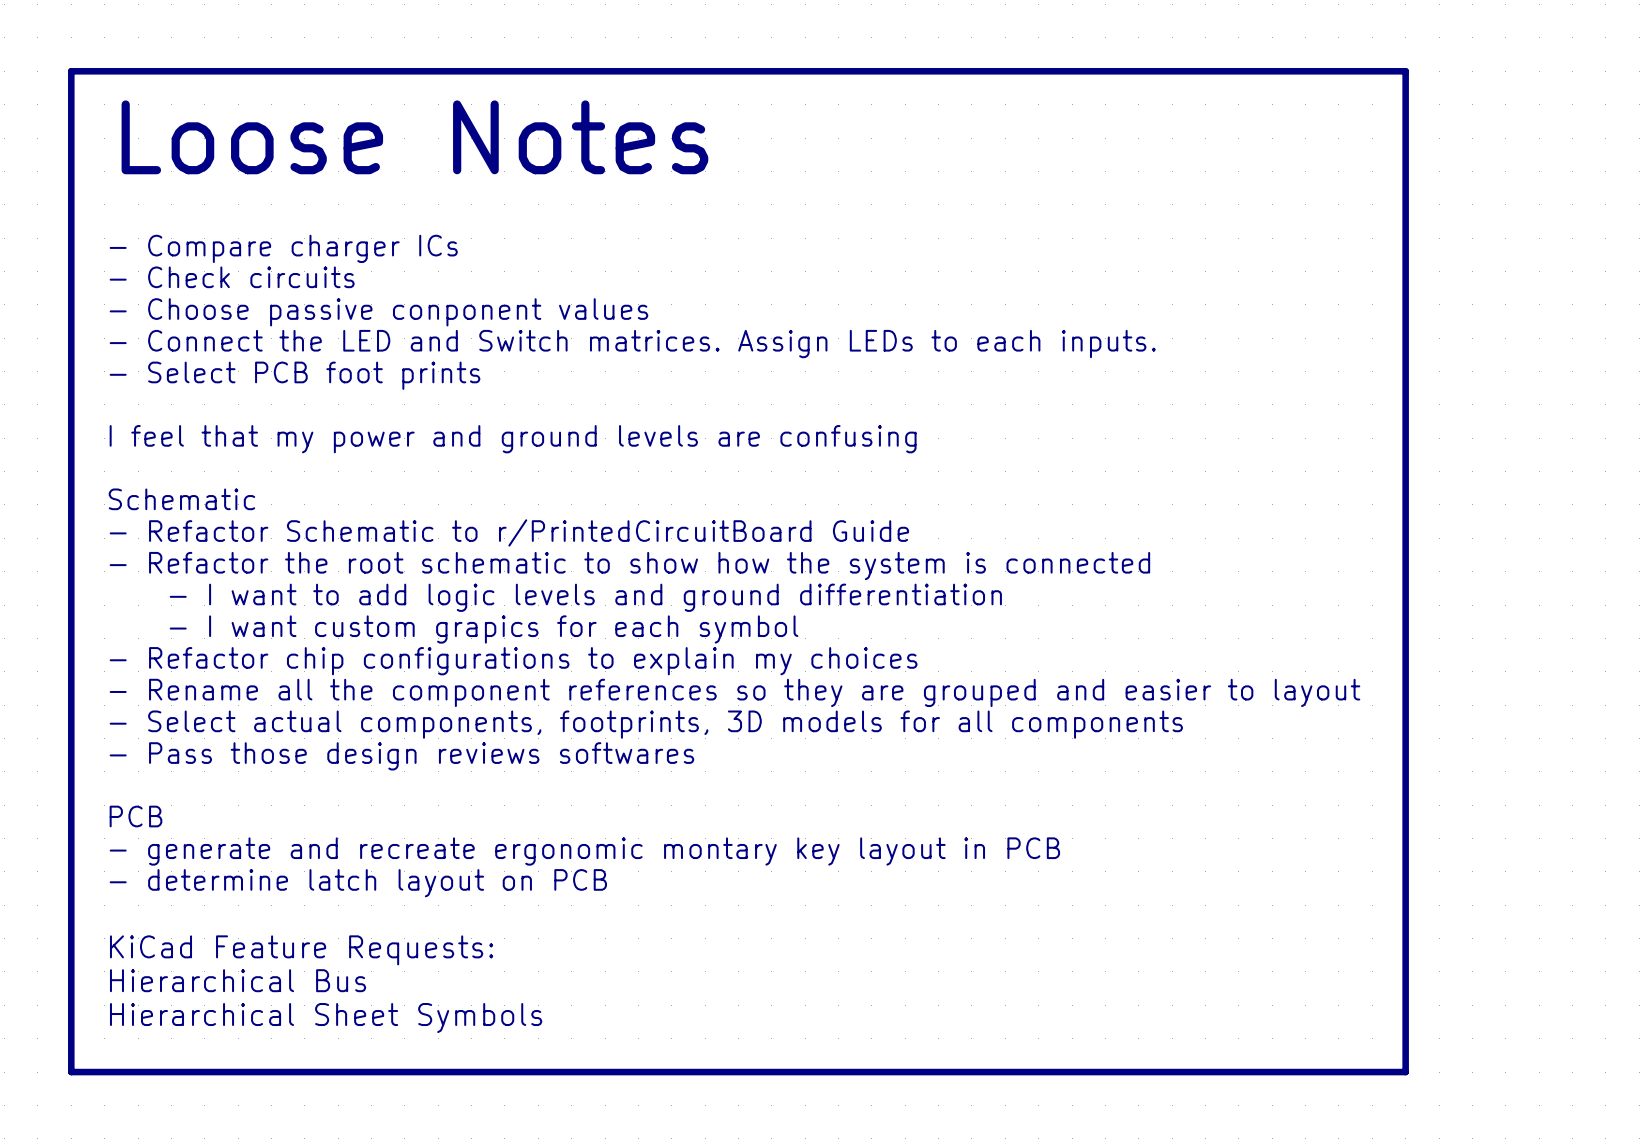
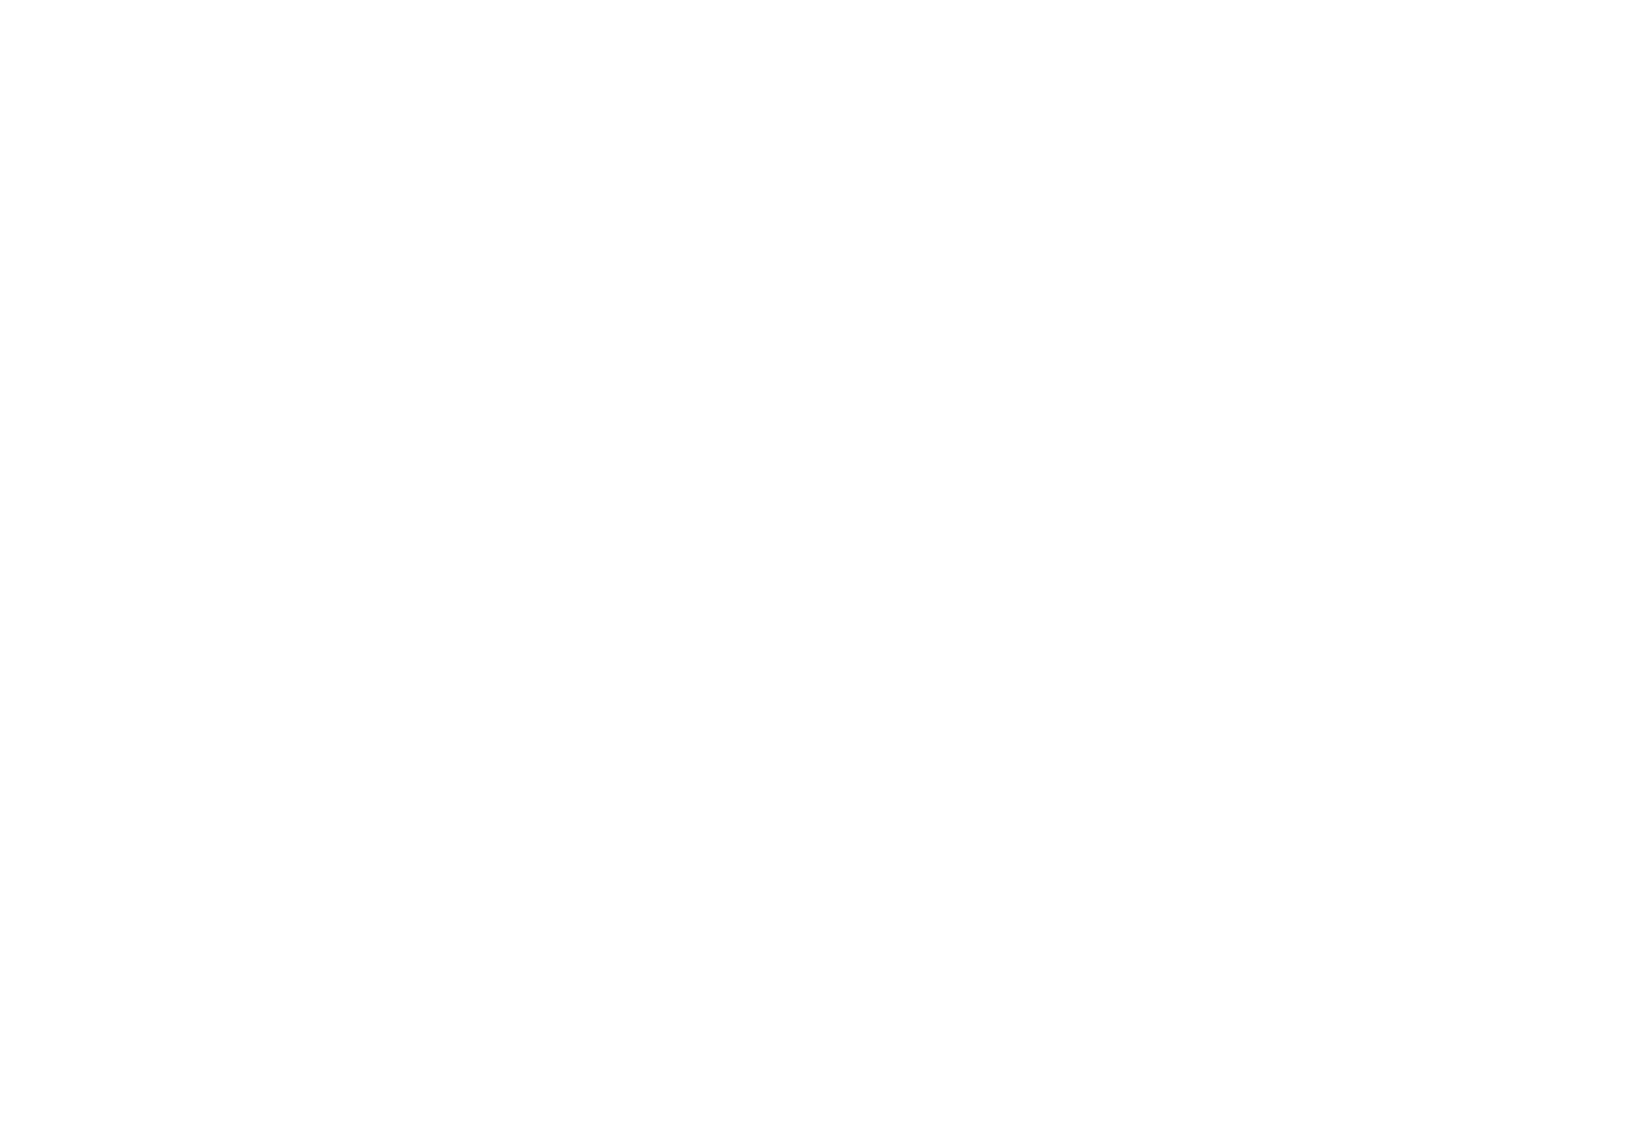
line: (71, 71) (1405, 71) (1405, 1072) (71, 1072) (71, 71) -> none
text: Loose Notes (414, 137) -> none
text: - Compare charger ICs (283, 248) -> none
text: - Check circuits (232, 277) -> none
text: - Choose passive conponent values (378, 312) -> none
text: - Connect the LED and Switch matrices. Assign LEDs to each inputs. (632, 344) -> none
text: - Select PCB foot prints (294, 375) -> none
text: I feel that my power and ground levels are confusing (513, 439) -> none
text: Schematic (181, 499) -> none
text: - Refactor Schematic to r/PrintedCircuitBoard Guide (509, 532) -> none
text: - Refactor the root schematic to show how the system is connected (629, 566) -> none
text: - I want to add logic levels and ground differentiation (585, 597) -> none
text: - I want custom grapics for each symbol (484, 629) -> none
text: - Refactor chip configurations to explain my choices (513, 661) -> none
text: - Rename all the component references so they are grouped and easier to layout (734, 692) -> none
text: - Select actual components, footprints, 3D models for all components (646, 724) -> none
text: - Pass those design reviews softwares (401, 756) -> none
text: PCB (135, 816) -> none
text: - generate and recreate ergonomic montary key layout in PCB (584, 851) -> none
text: - determine latch layout on PCB (358, 883) -> none
text: KiCad Feature Requests: (301, 950) -> none
text: Hierarchical Bus (238, 980) -> none
text: Hierarchical Sheet Symbols (326, 1018) -> none

